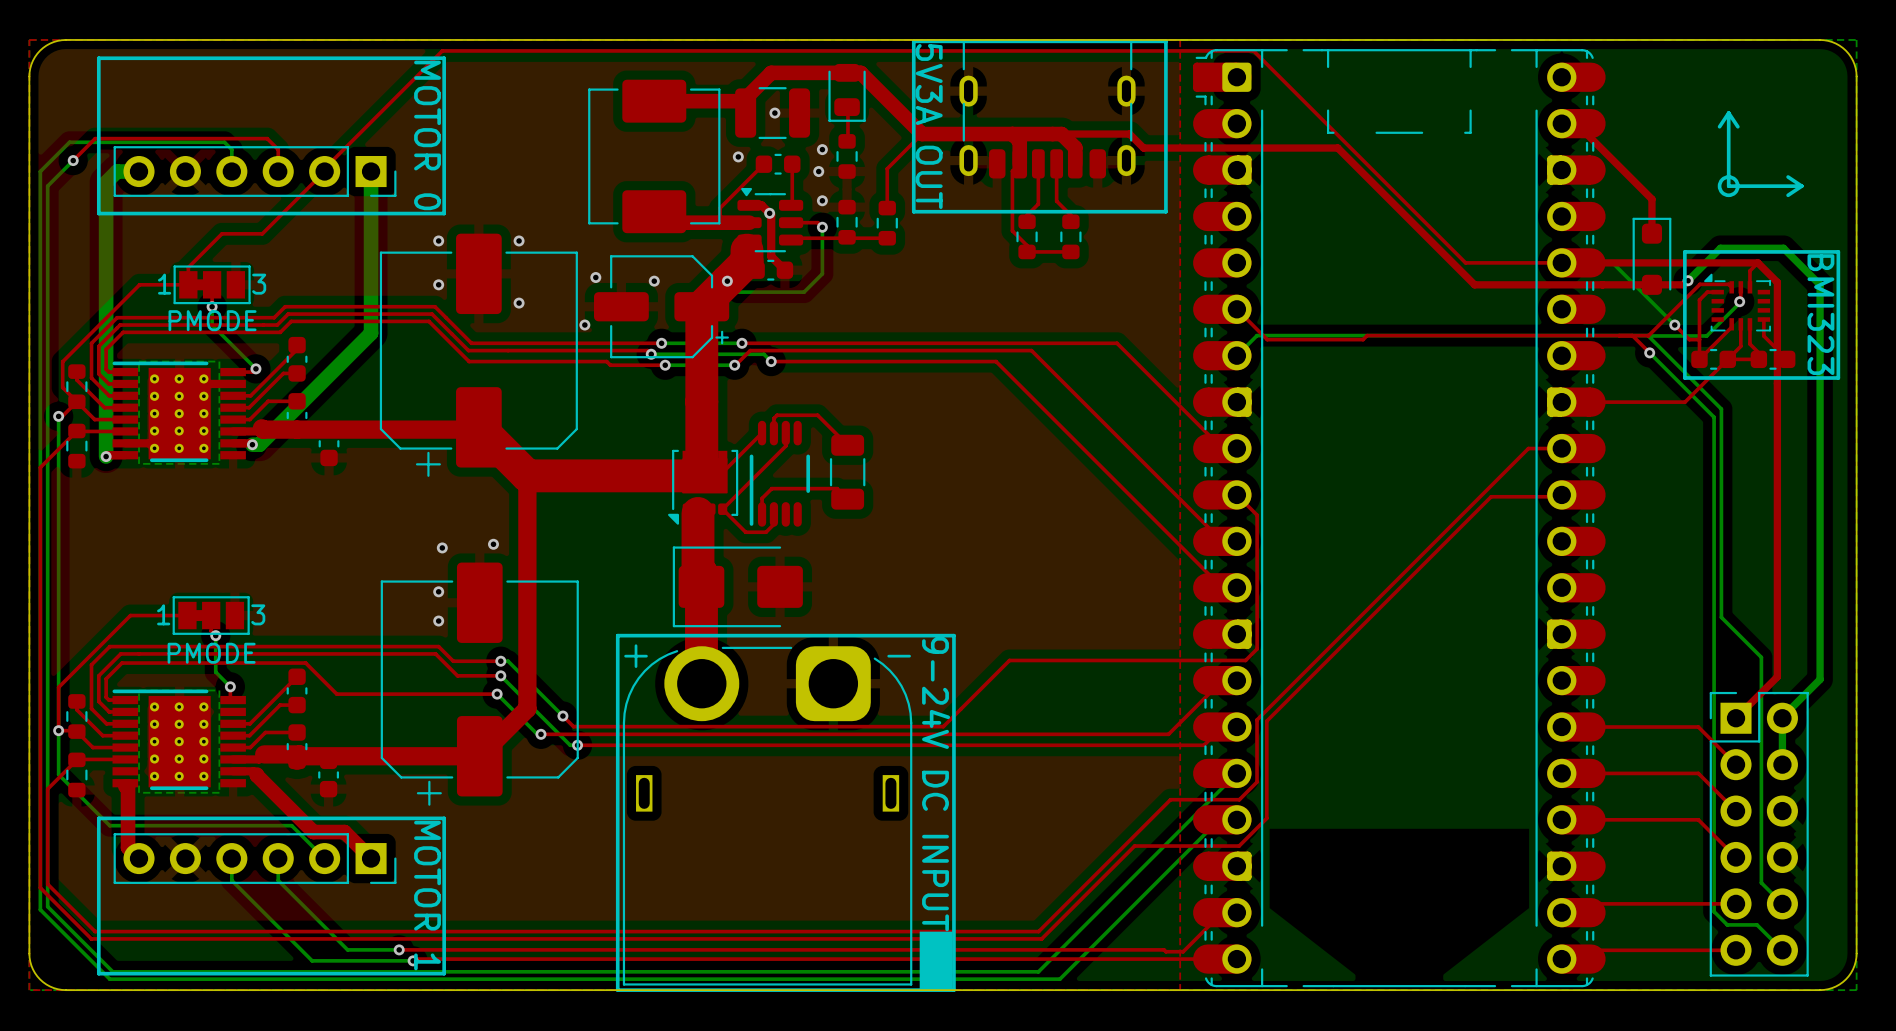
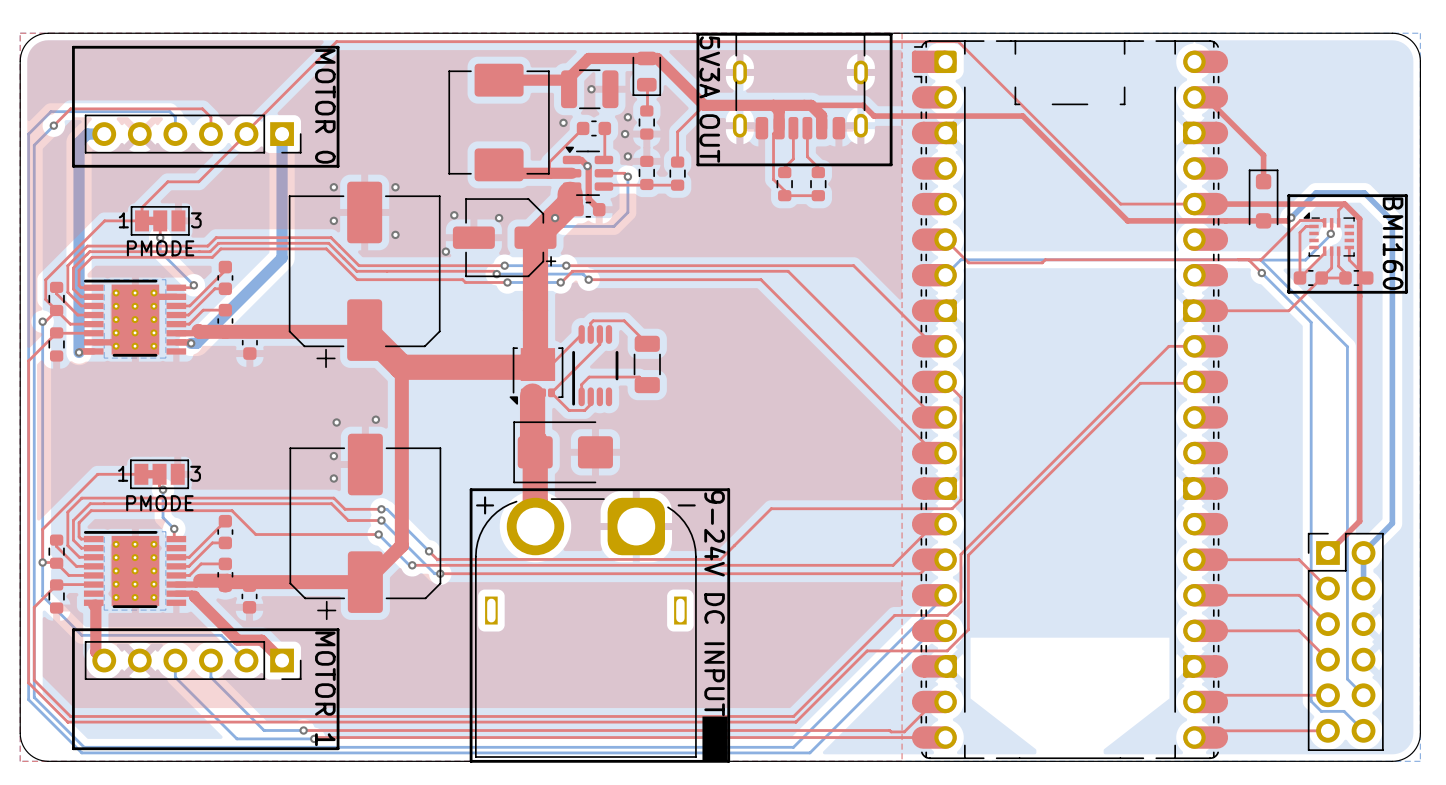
line: (1728, 113) (1737, 126) -> none
line: (1728, 113) (1719, 126) -> none
line: (1728, 113) (1728, 186) (1801, 186) -> none
drawing: [1717, 175, 1740, 198] -> none
line: (1788, 177) (1801, 186) -> none
line: (1801, 186) (1788, 195) -> none
bottom track: (1561, 262) (1612, 262) (1674, 325) -> none
part value: BMI323 (1820, 314) -> BMI160 (1393, 243)
top track: (1674, 325) (1689, 339) (1699, 339) -> none
via: (1674, 325) -> none
bottom track: (1721, 409) (1721, 617) (1761, 657) -> (1316, 316) (1347, 346) (1347, 506)

